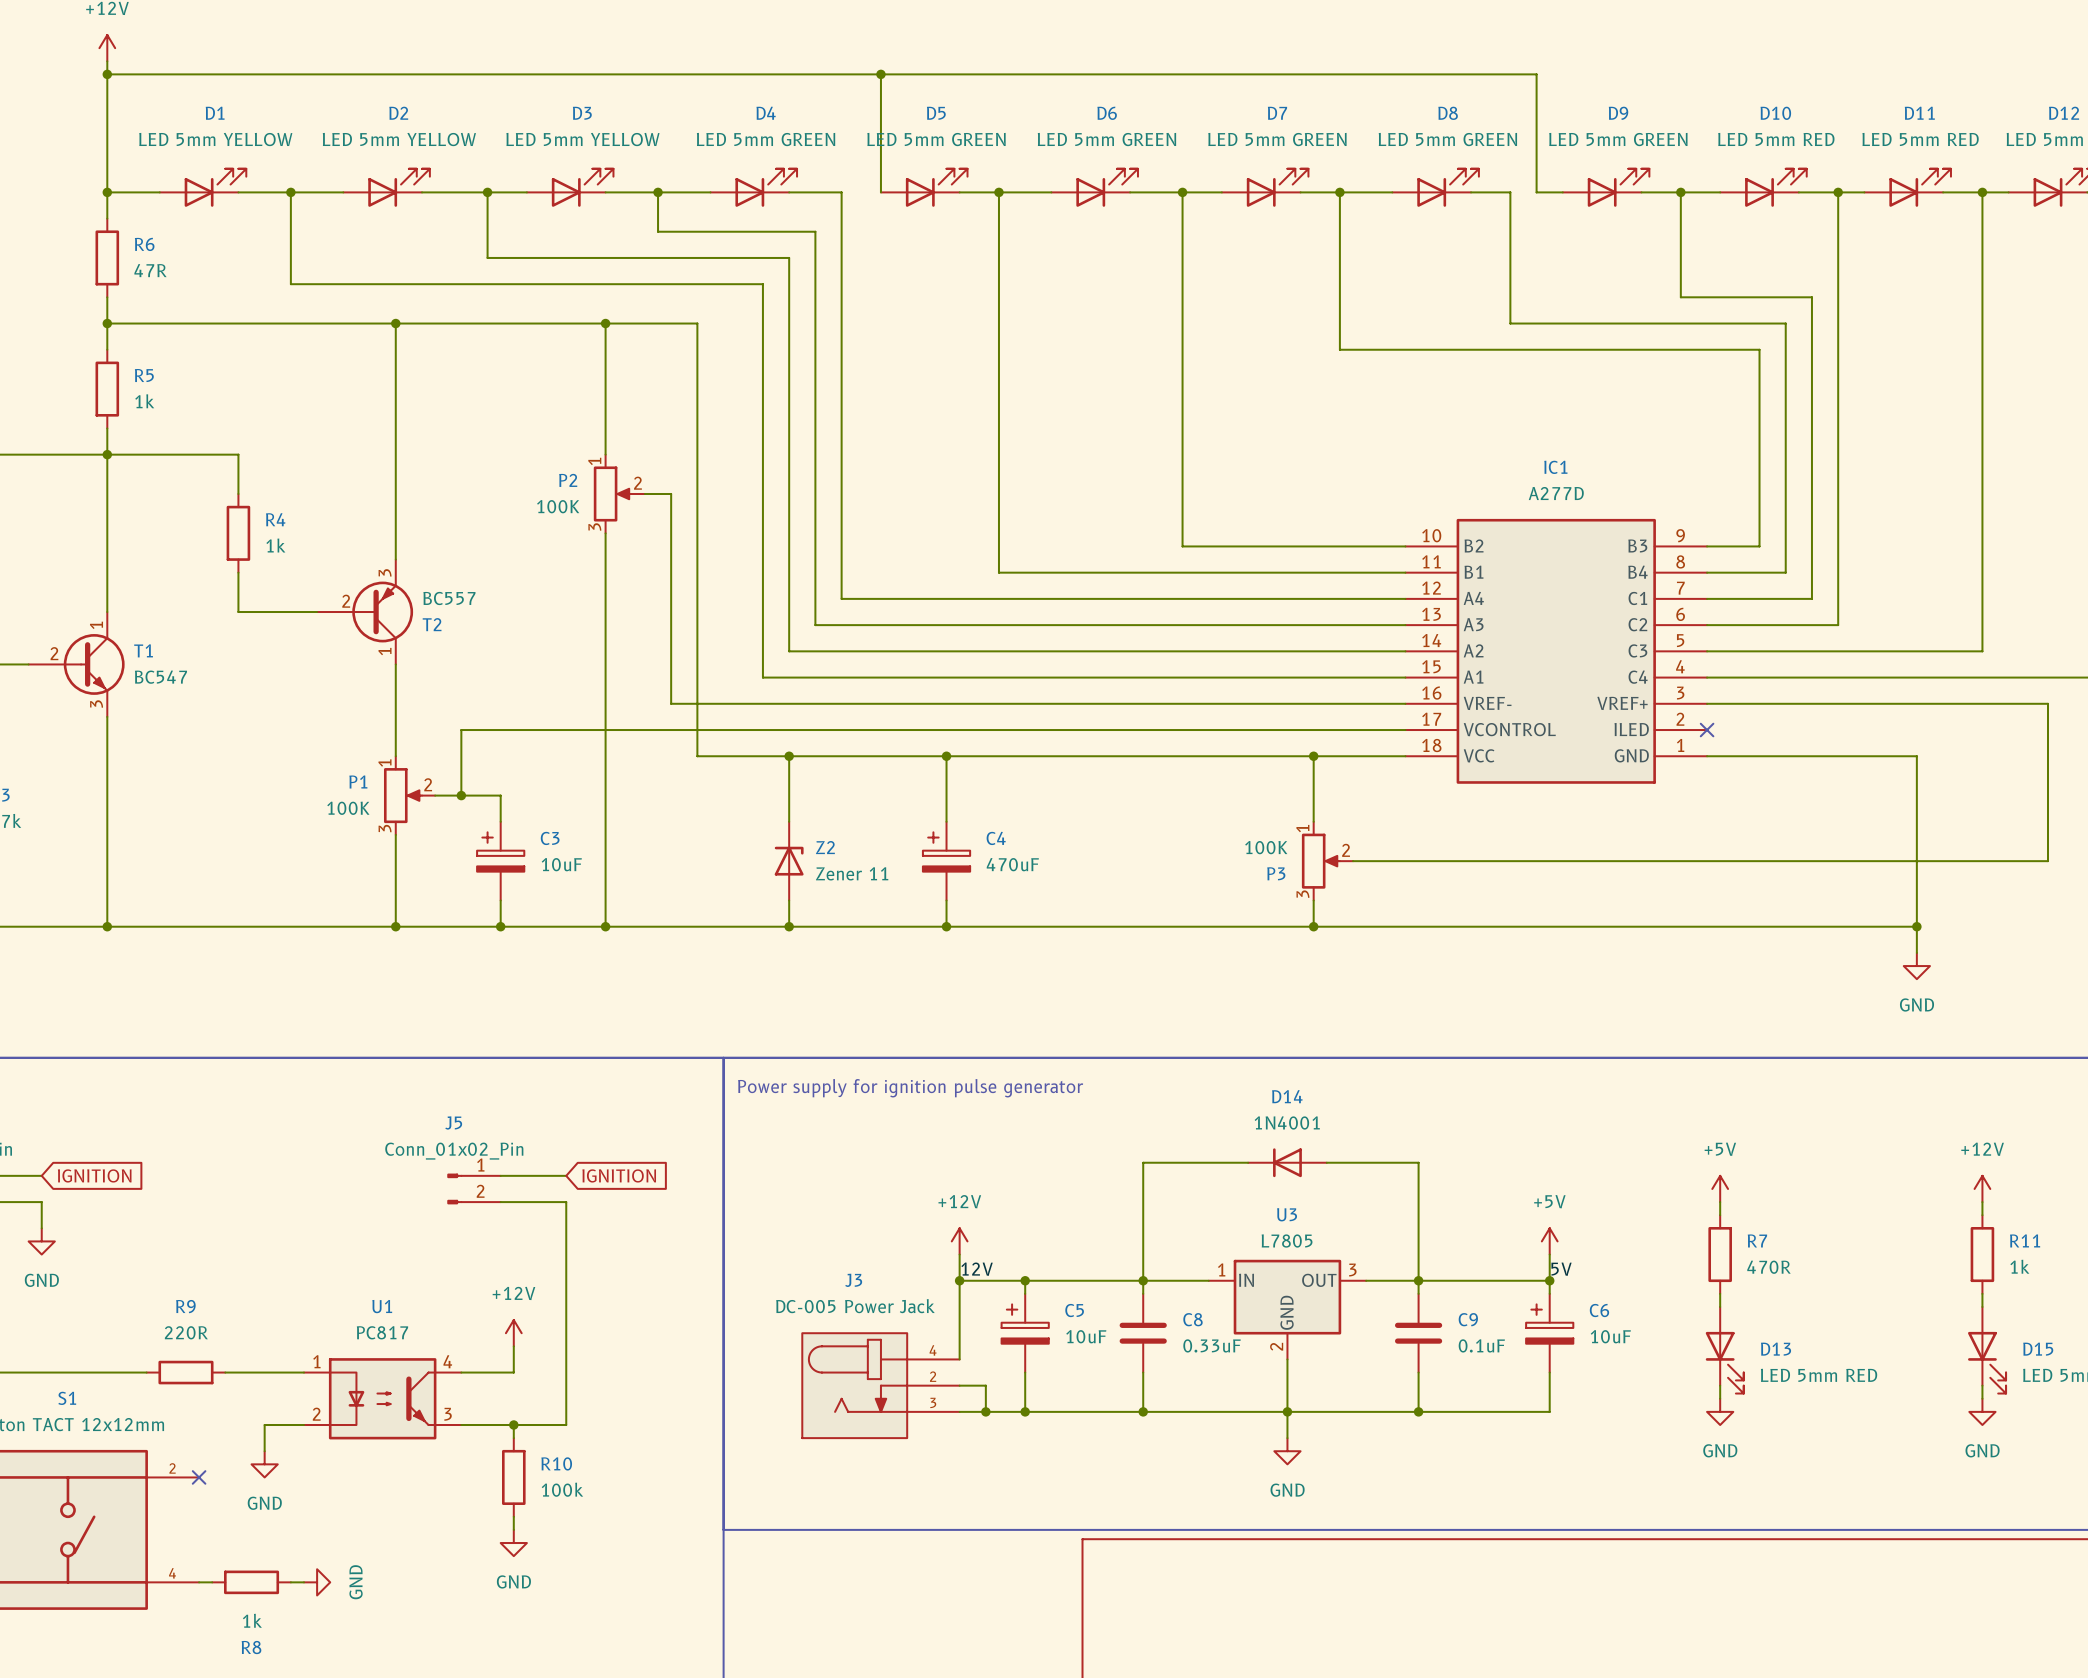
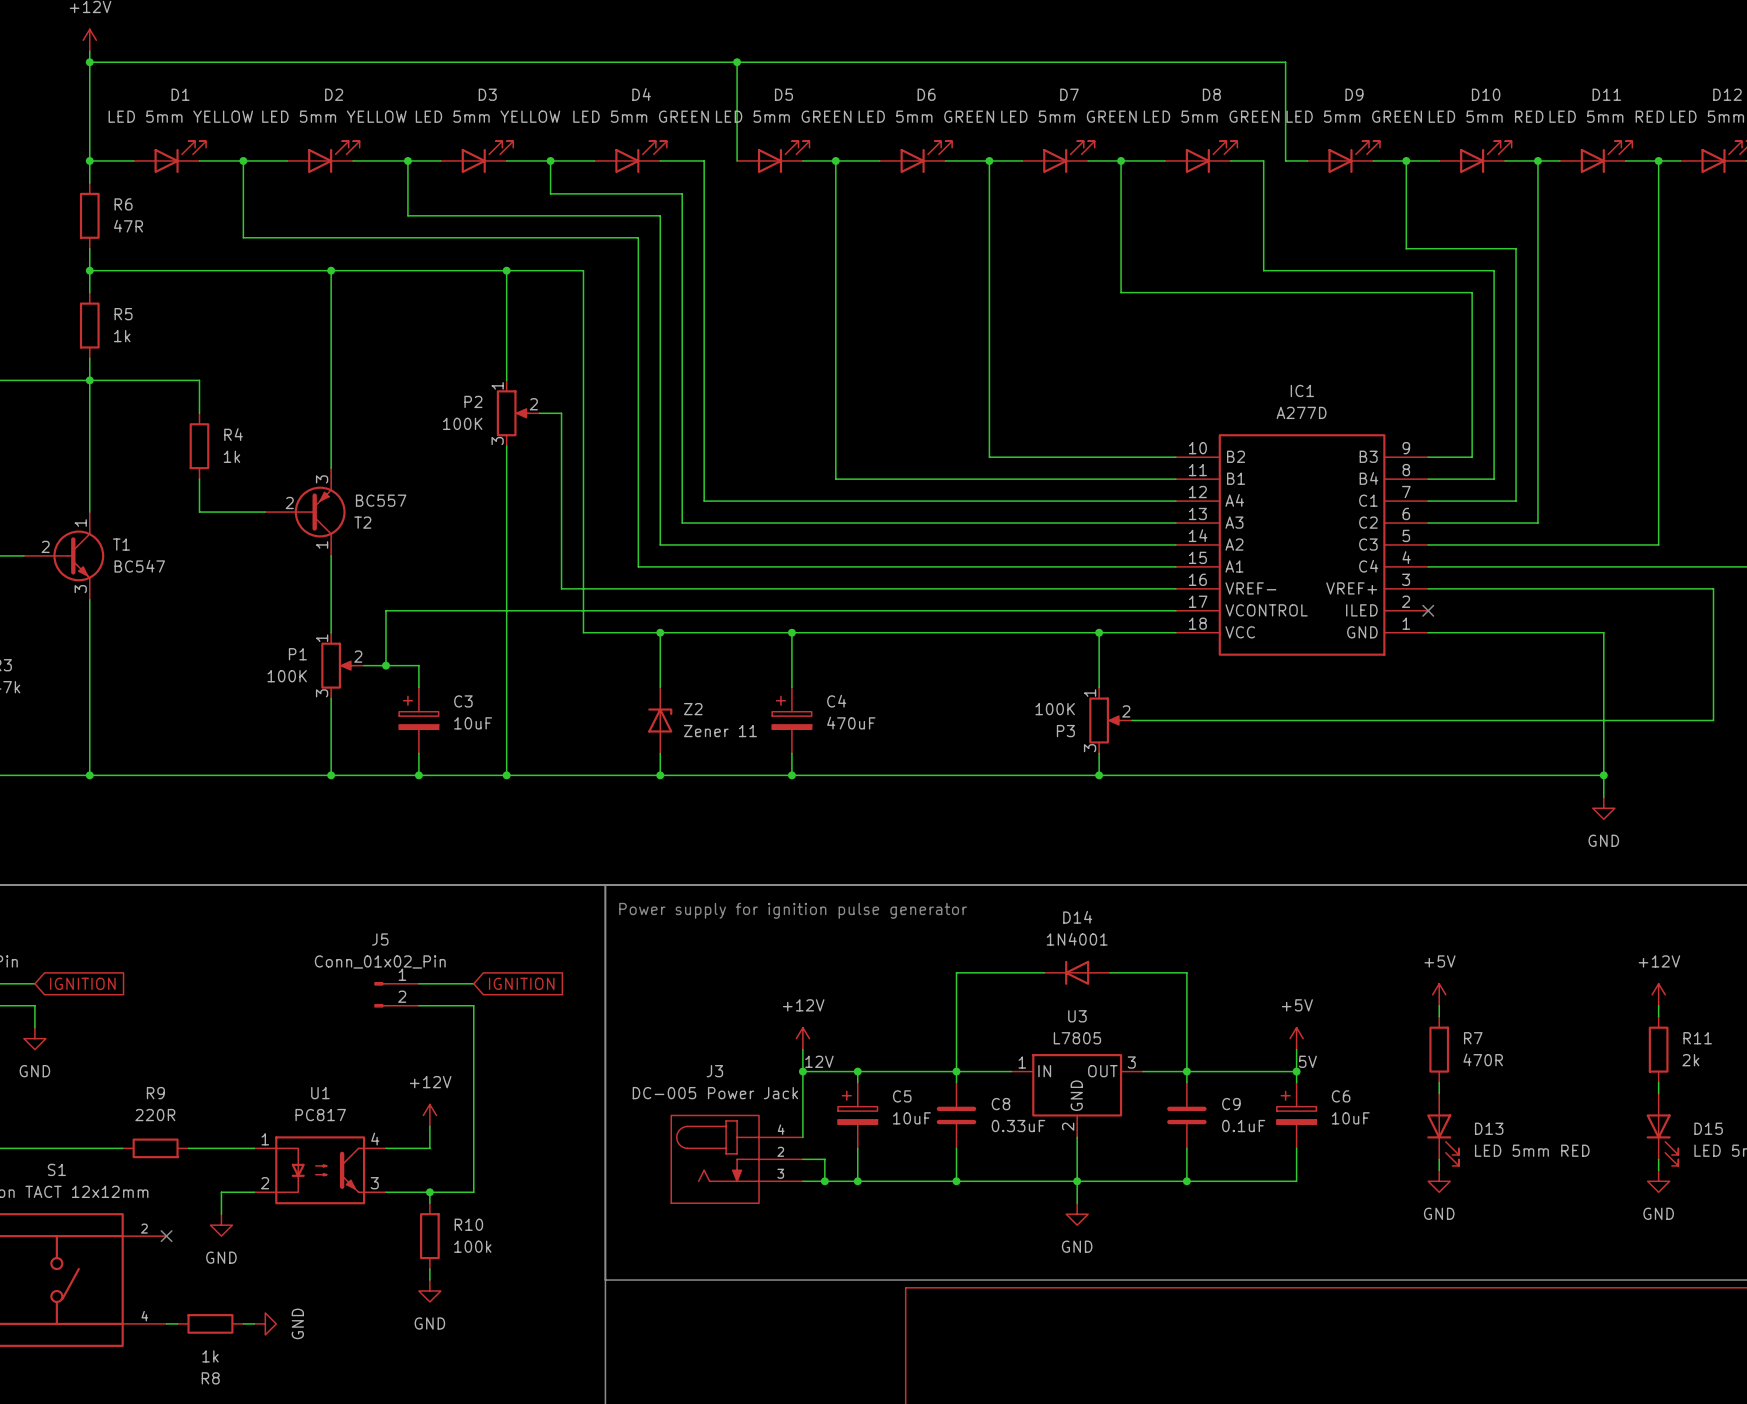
R11 value: 1k (2019, 1266) -> 2k (1690, 1060)

